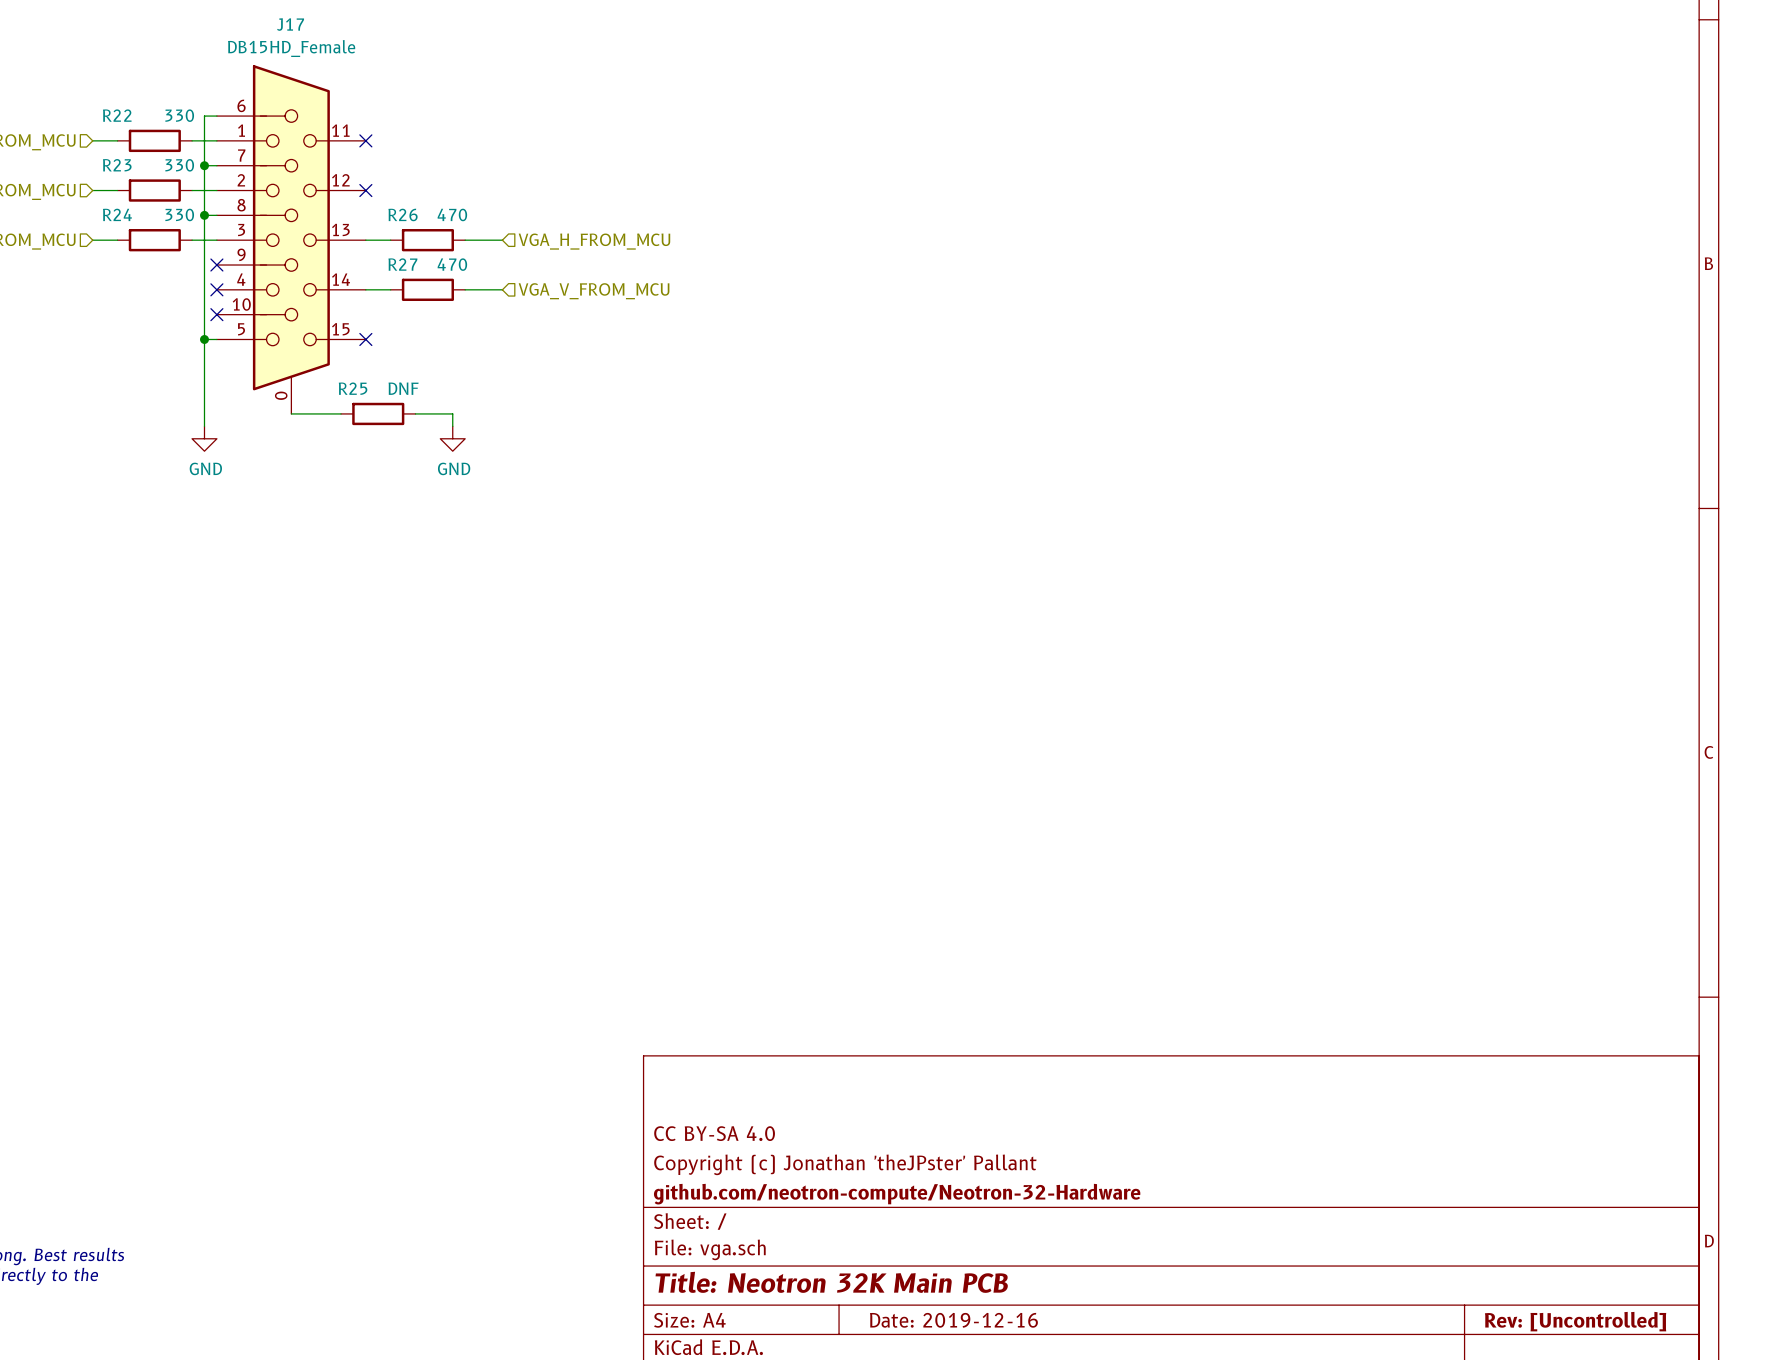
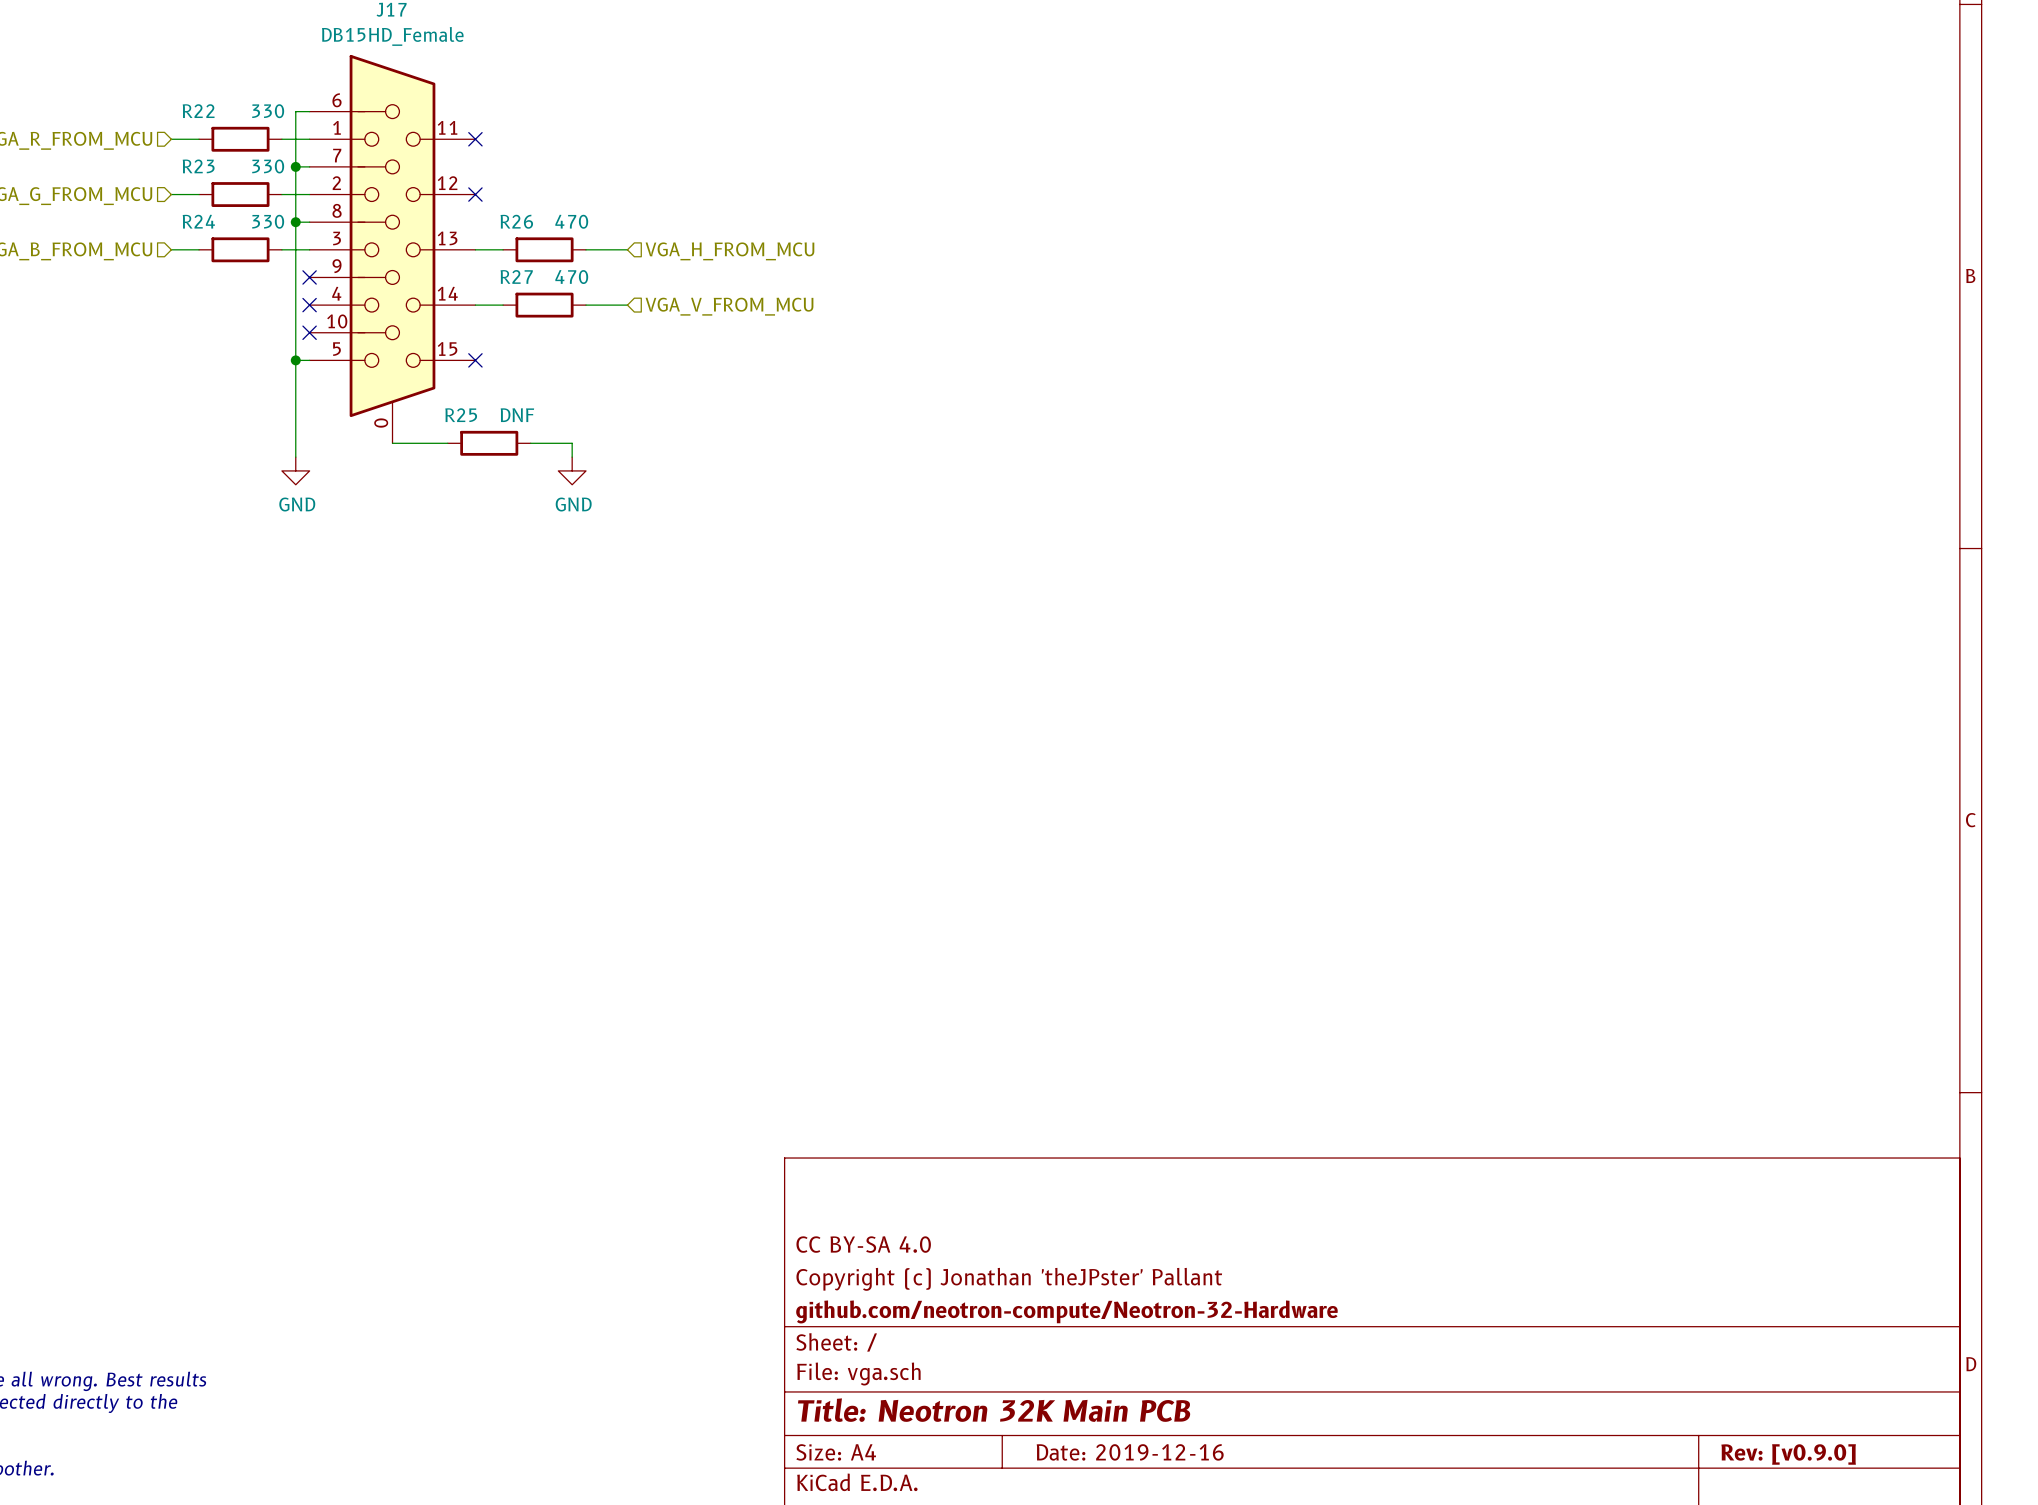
title block: Rev: [Uncontrolled] (1575, 1321) -> Rev: [v0.9.0] (1788, 1454)

